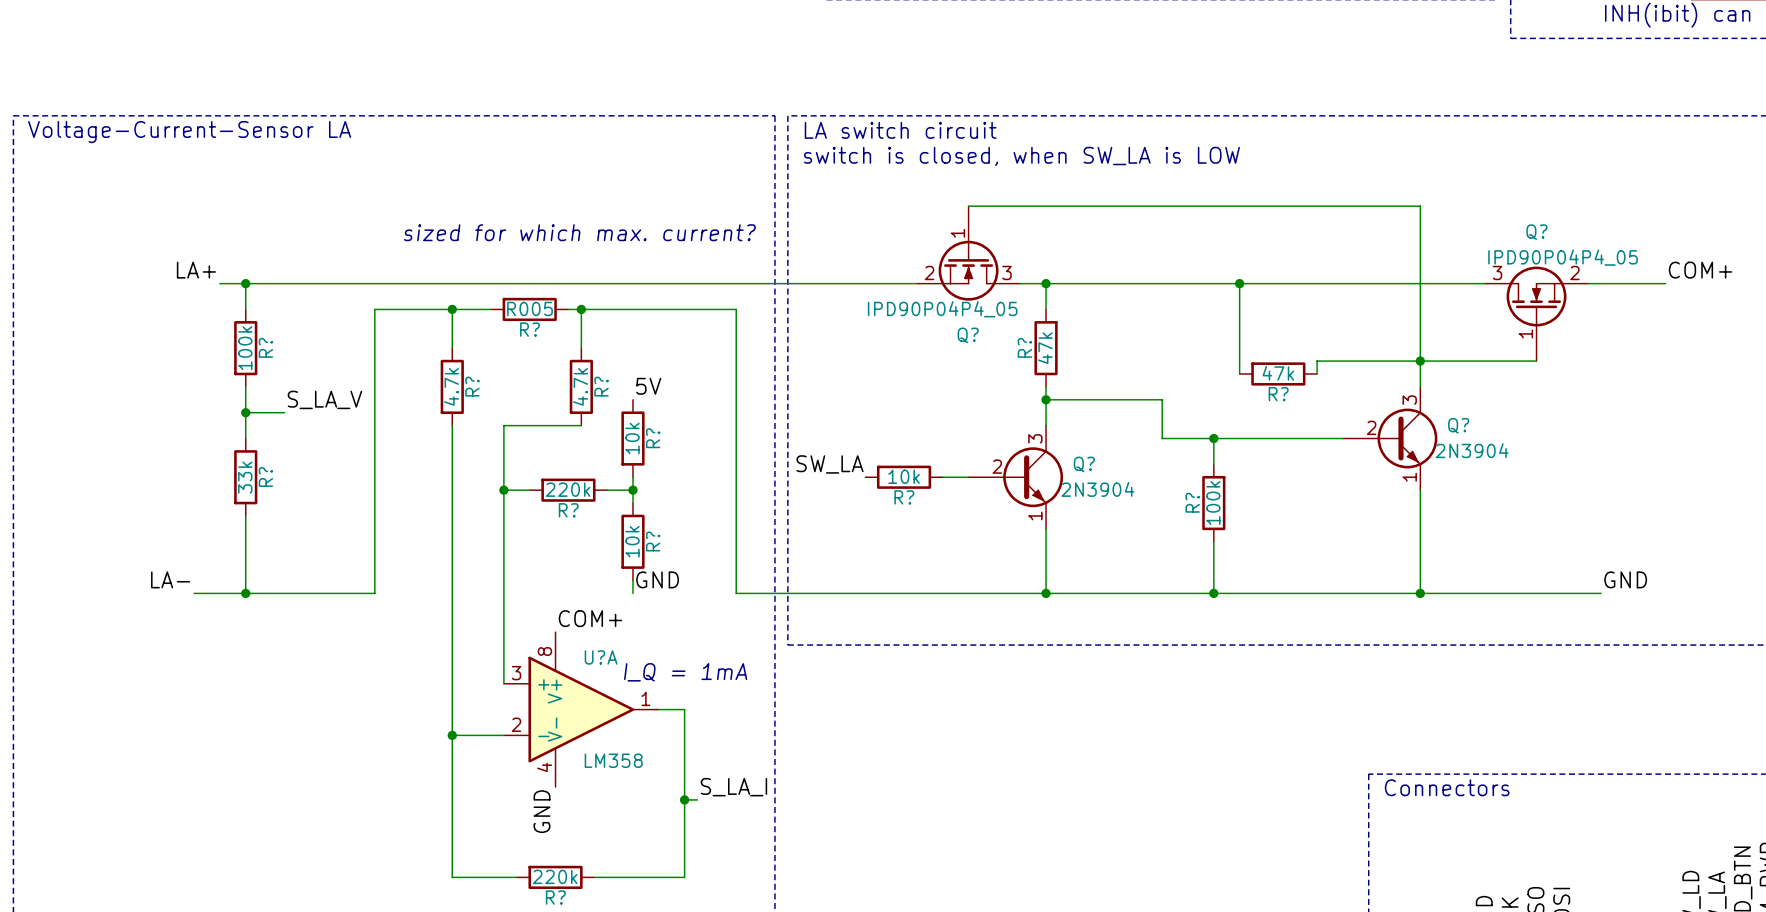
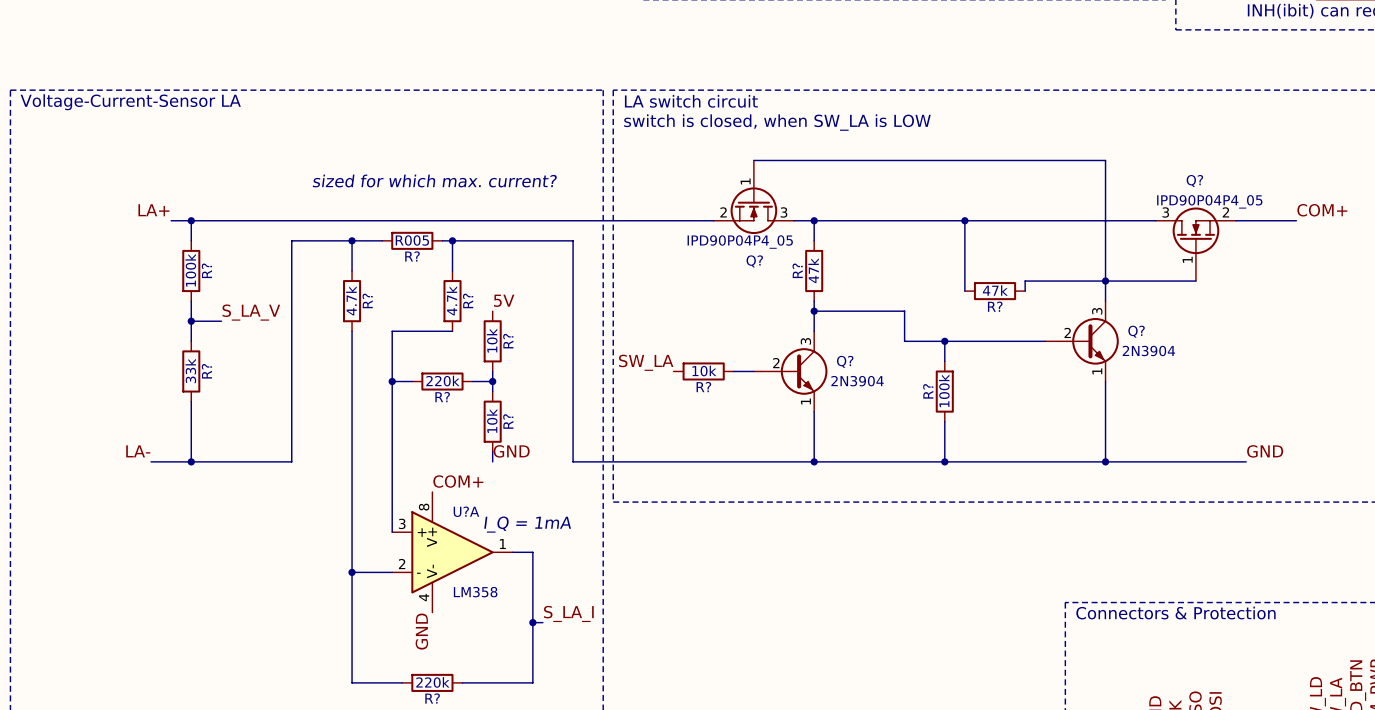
text: Connectors (1447, 787) -> Connectors & Protection (1175, 613)

